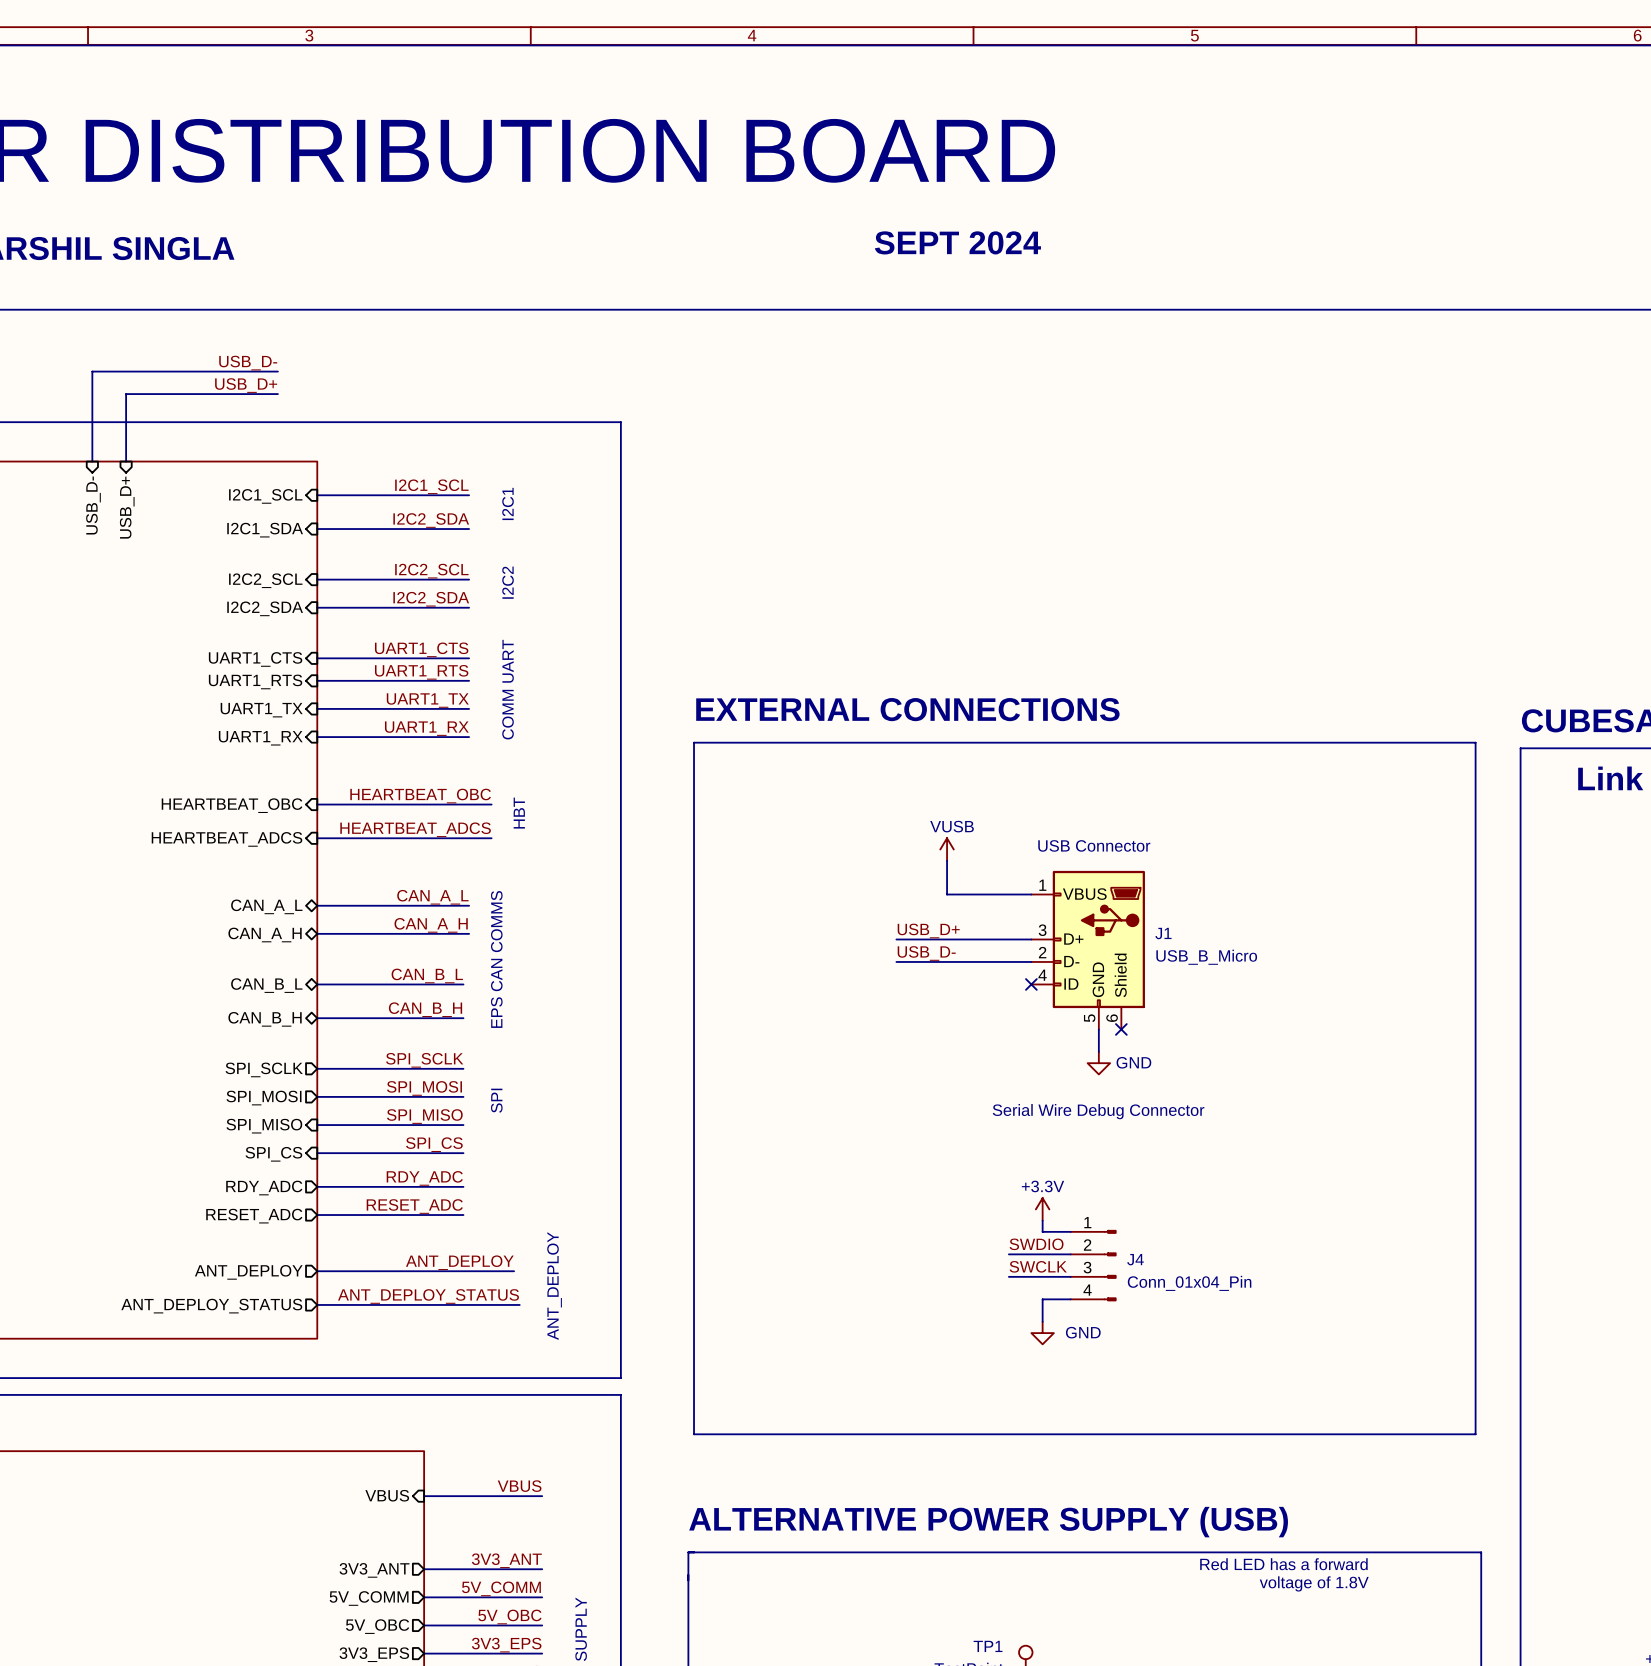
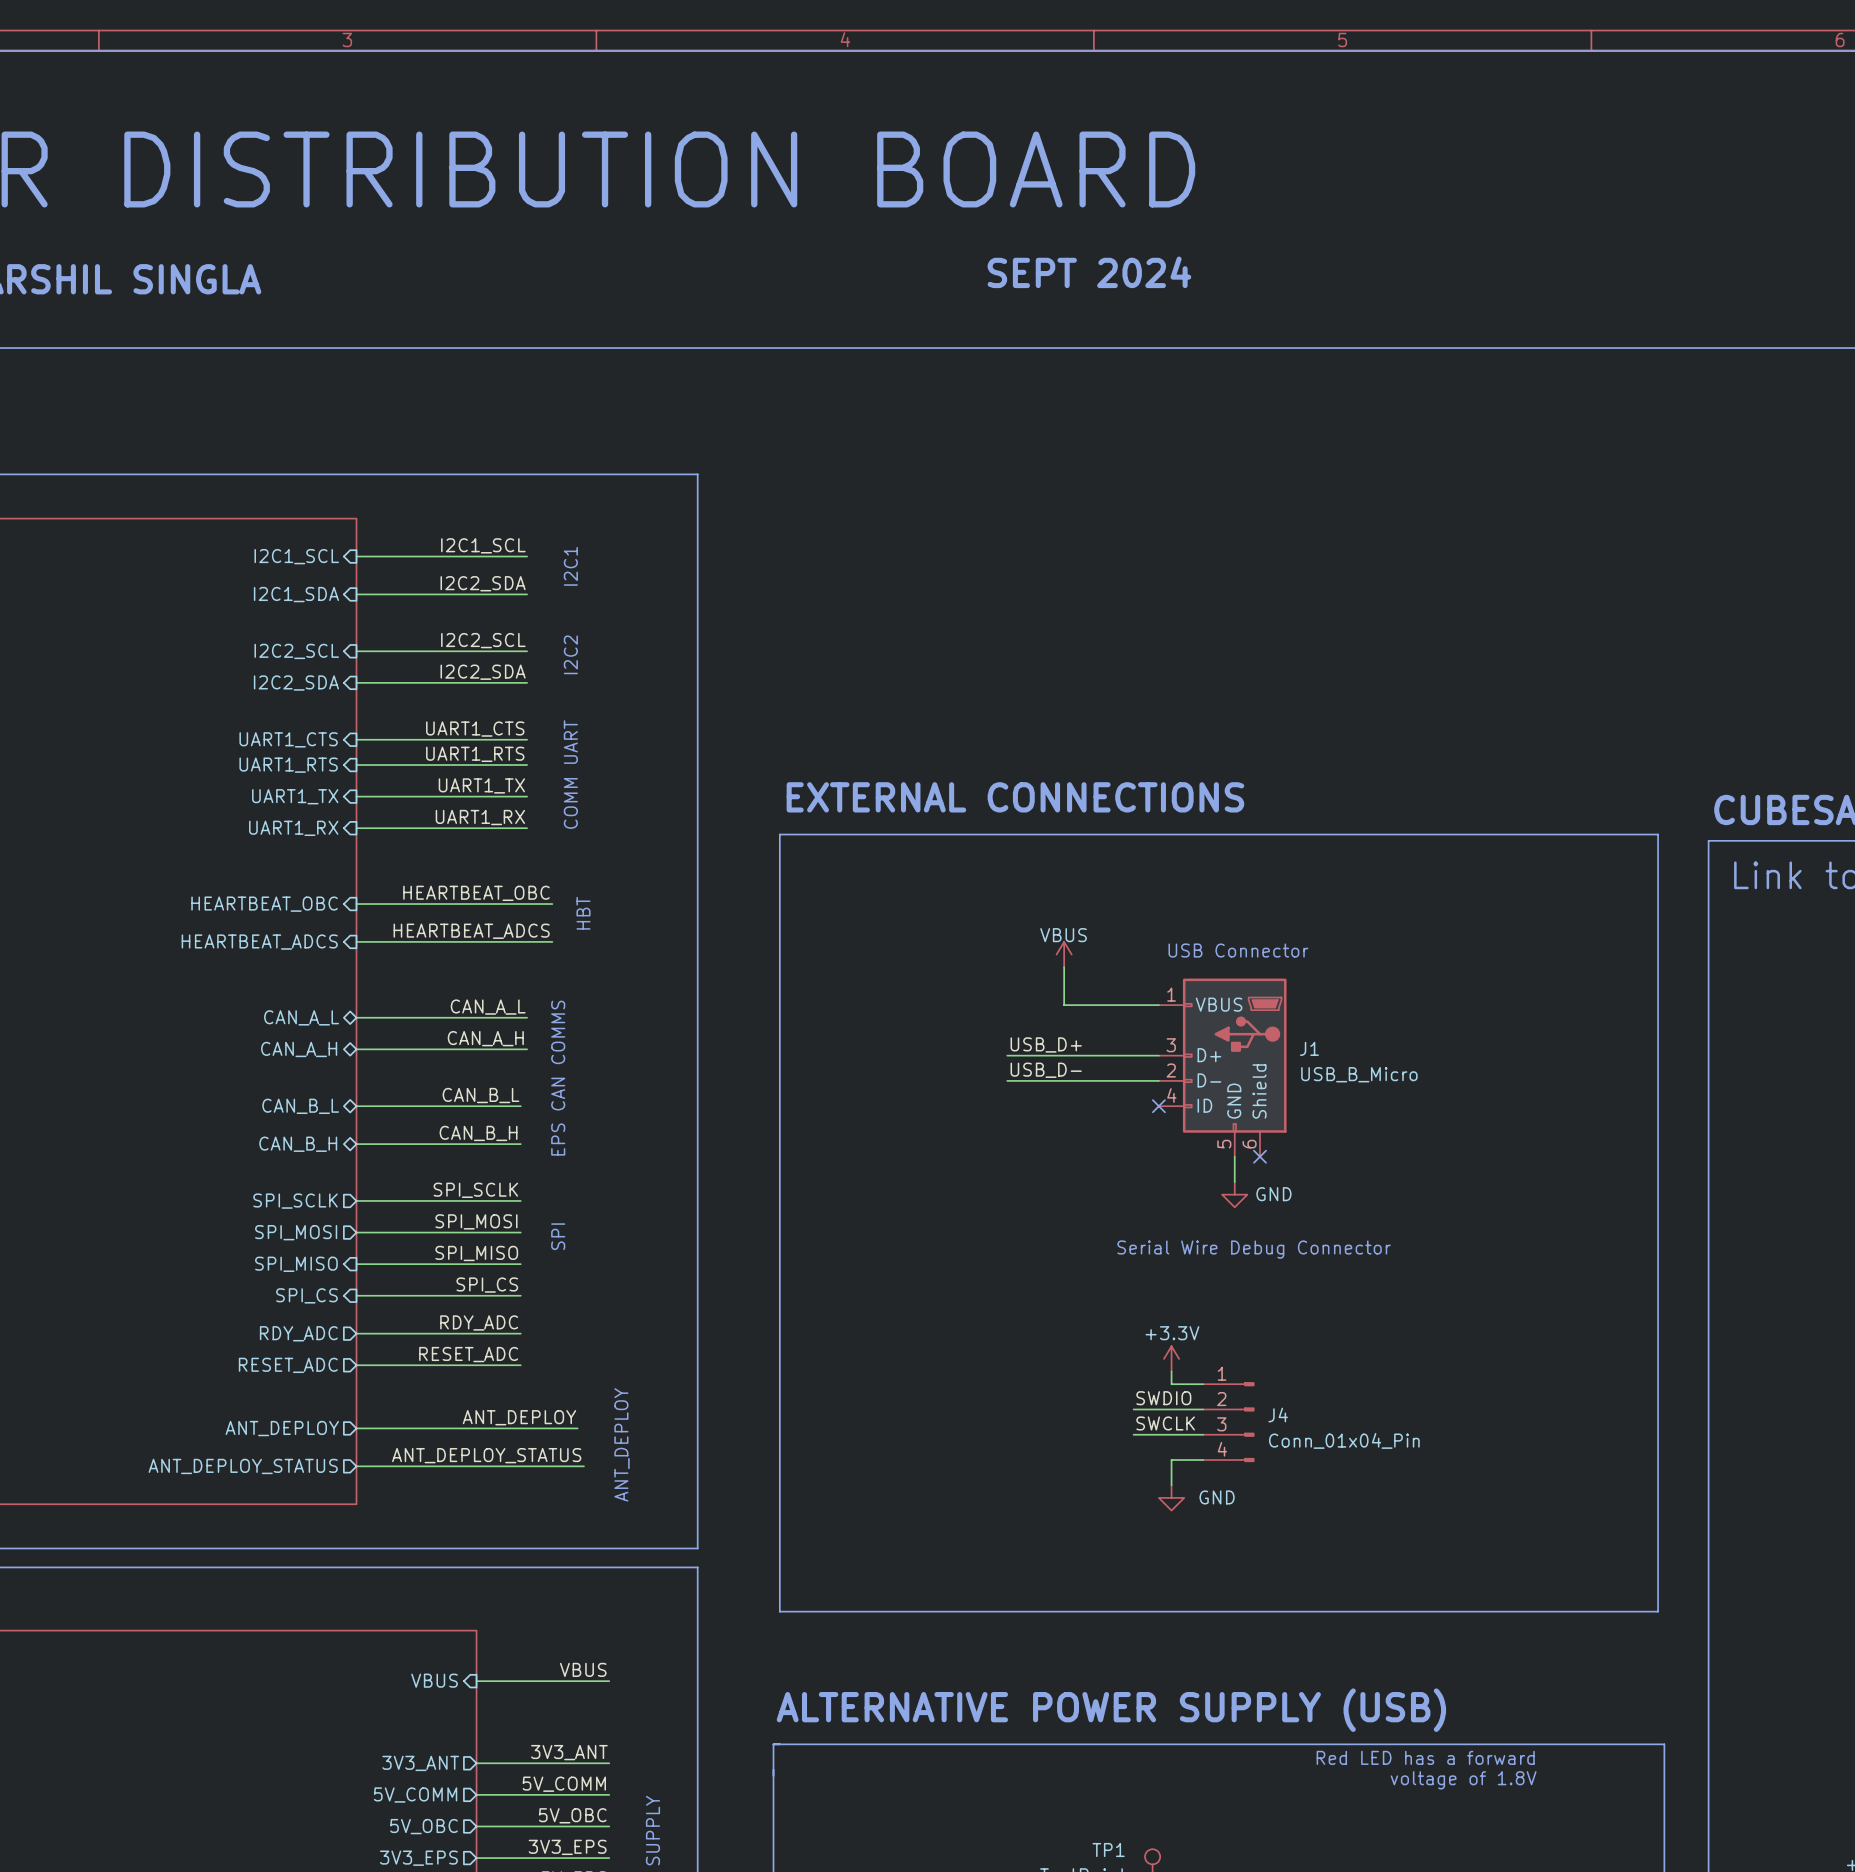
label: USB_D- (248, 363) -> none
wire: (277, 371) (92, 371) (92, 461) -> none
label: USB_D+ (246, 385) -> none
wire: (277, 394) (126, 394) (126, 461) -> none
sheet pin: USB_D- (93, 505) -> none
sheet pin: USB_D+ (127, 507) -> none
power symbol: VUSB (947, 849) -> VBUS (1064, 954)

